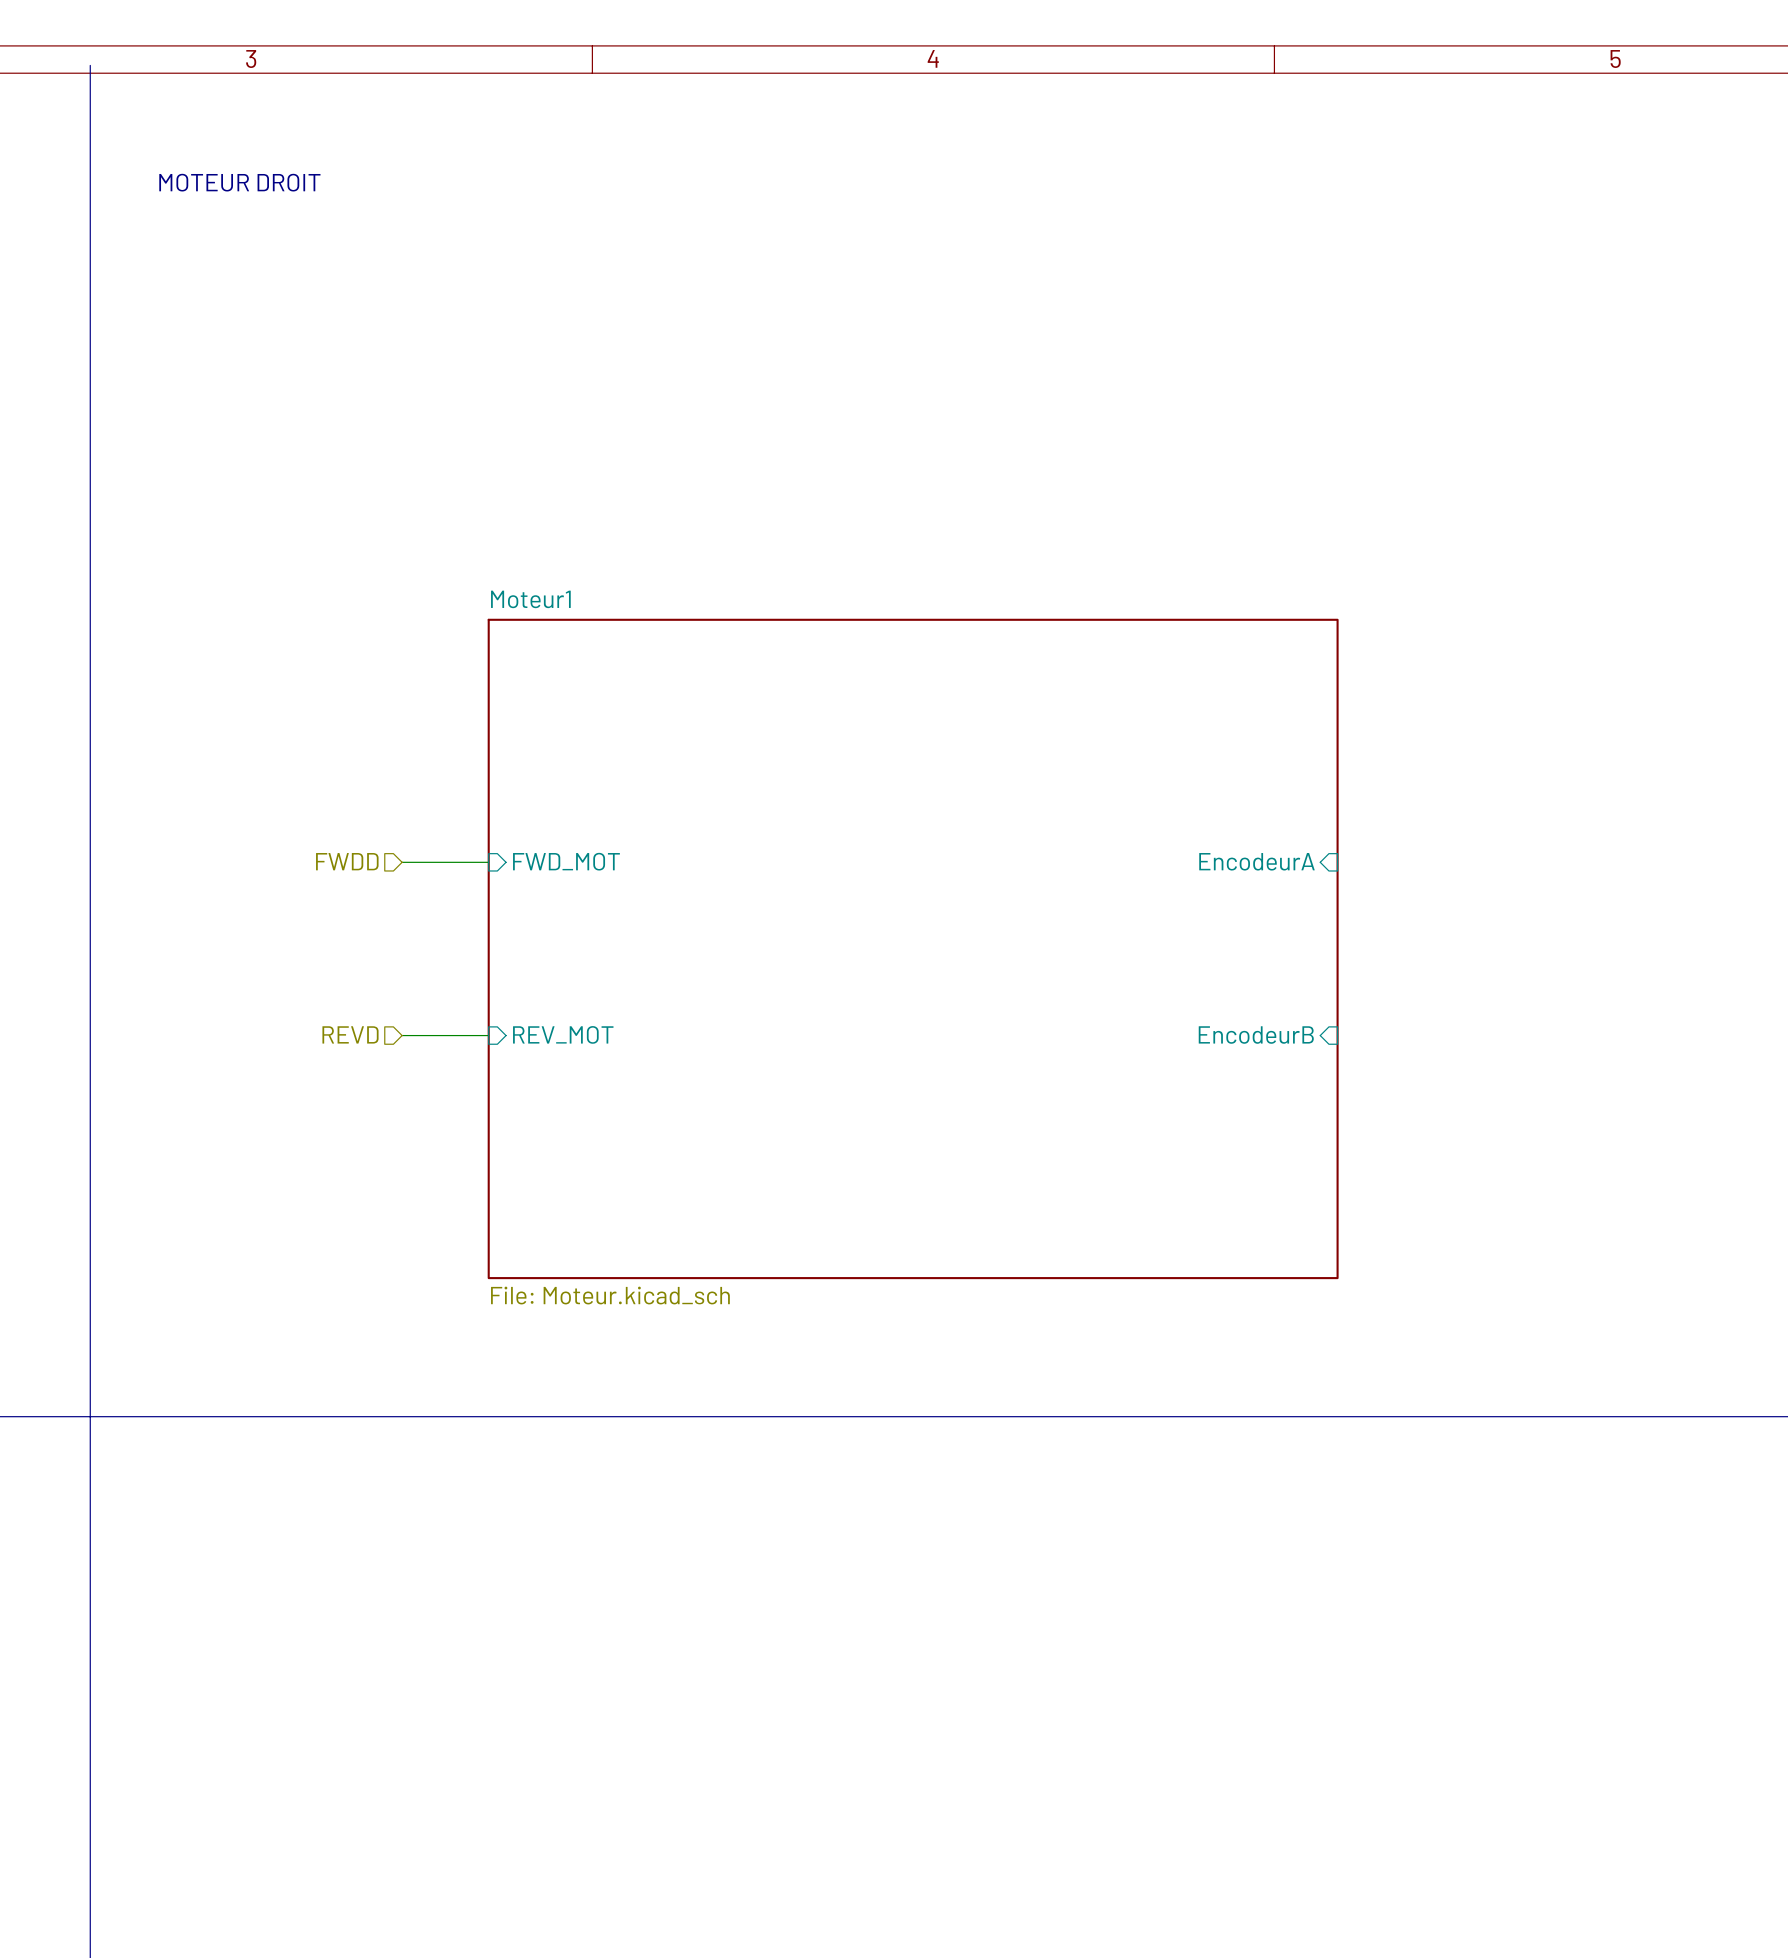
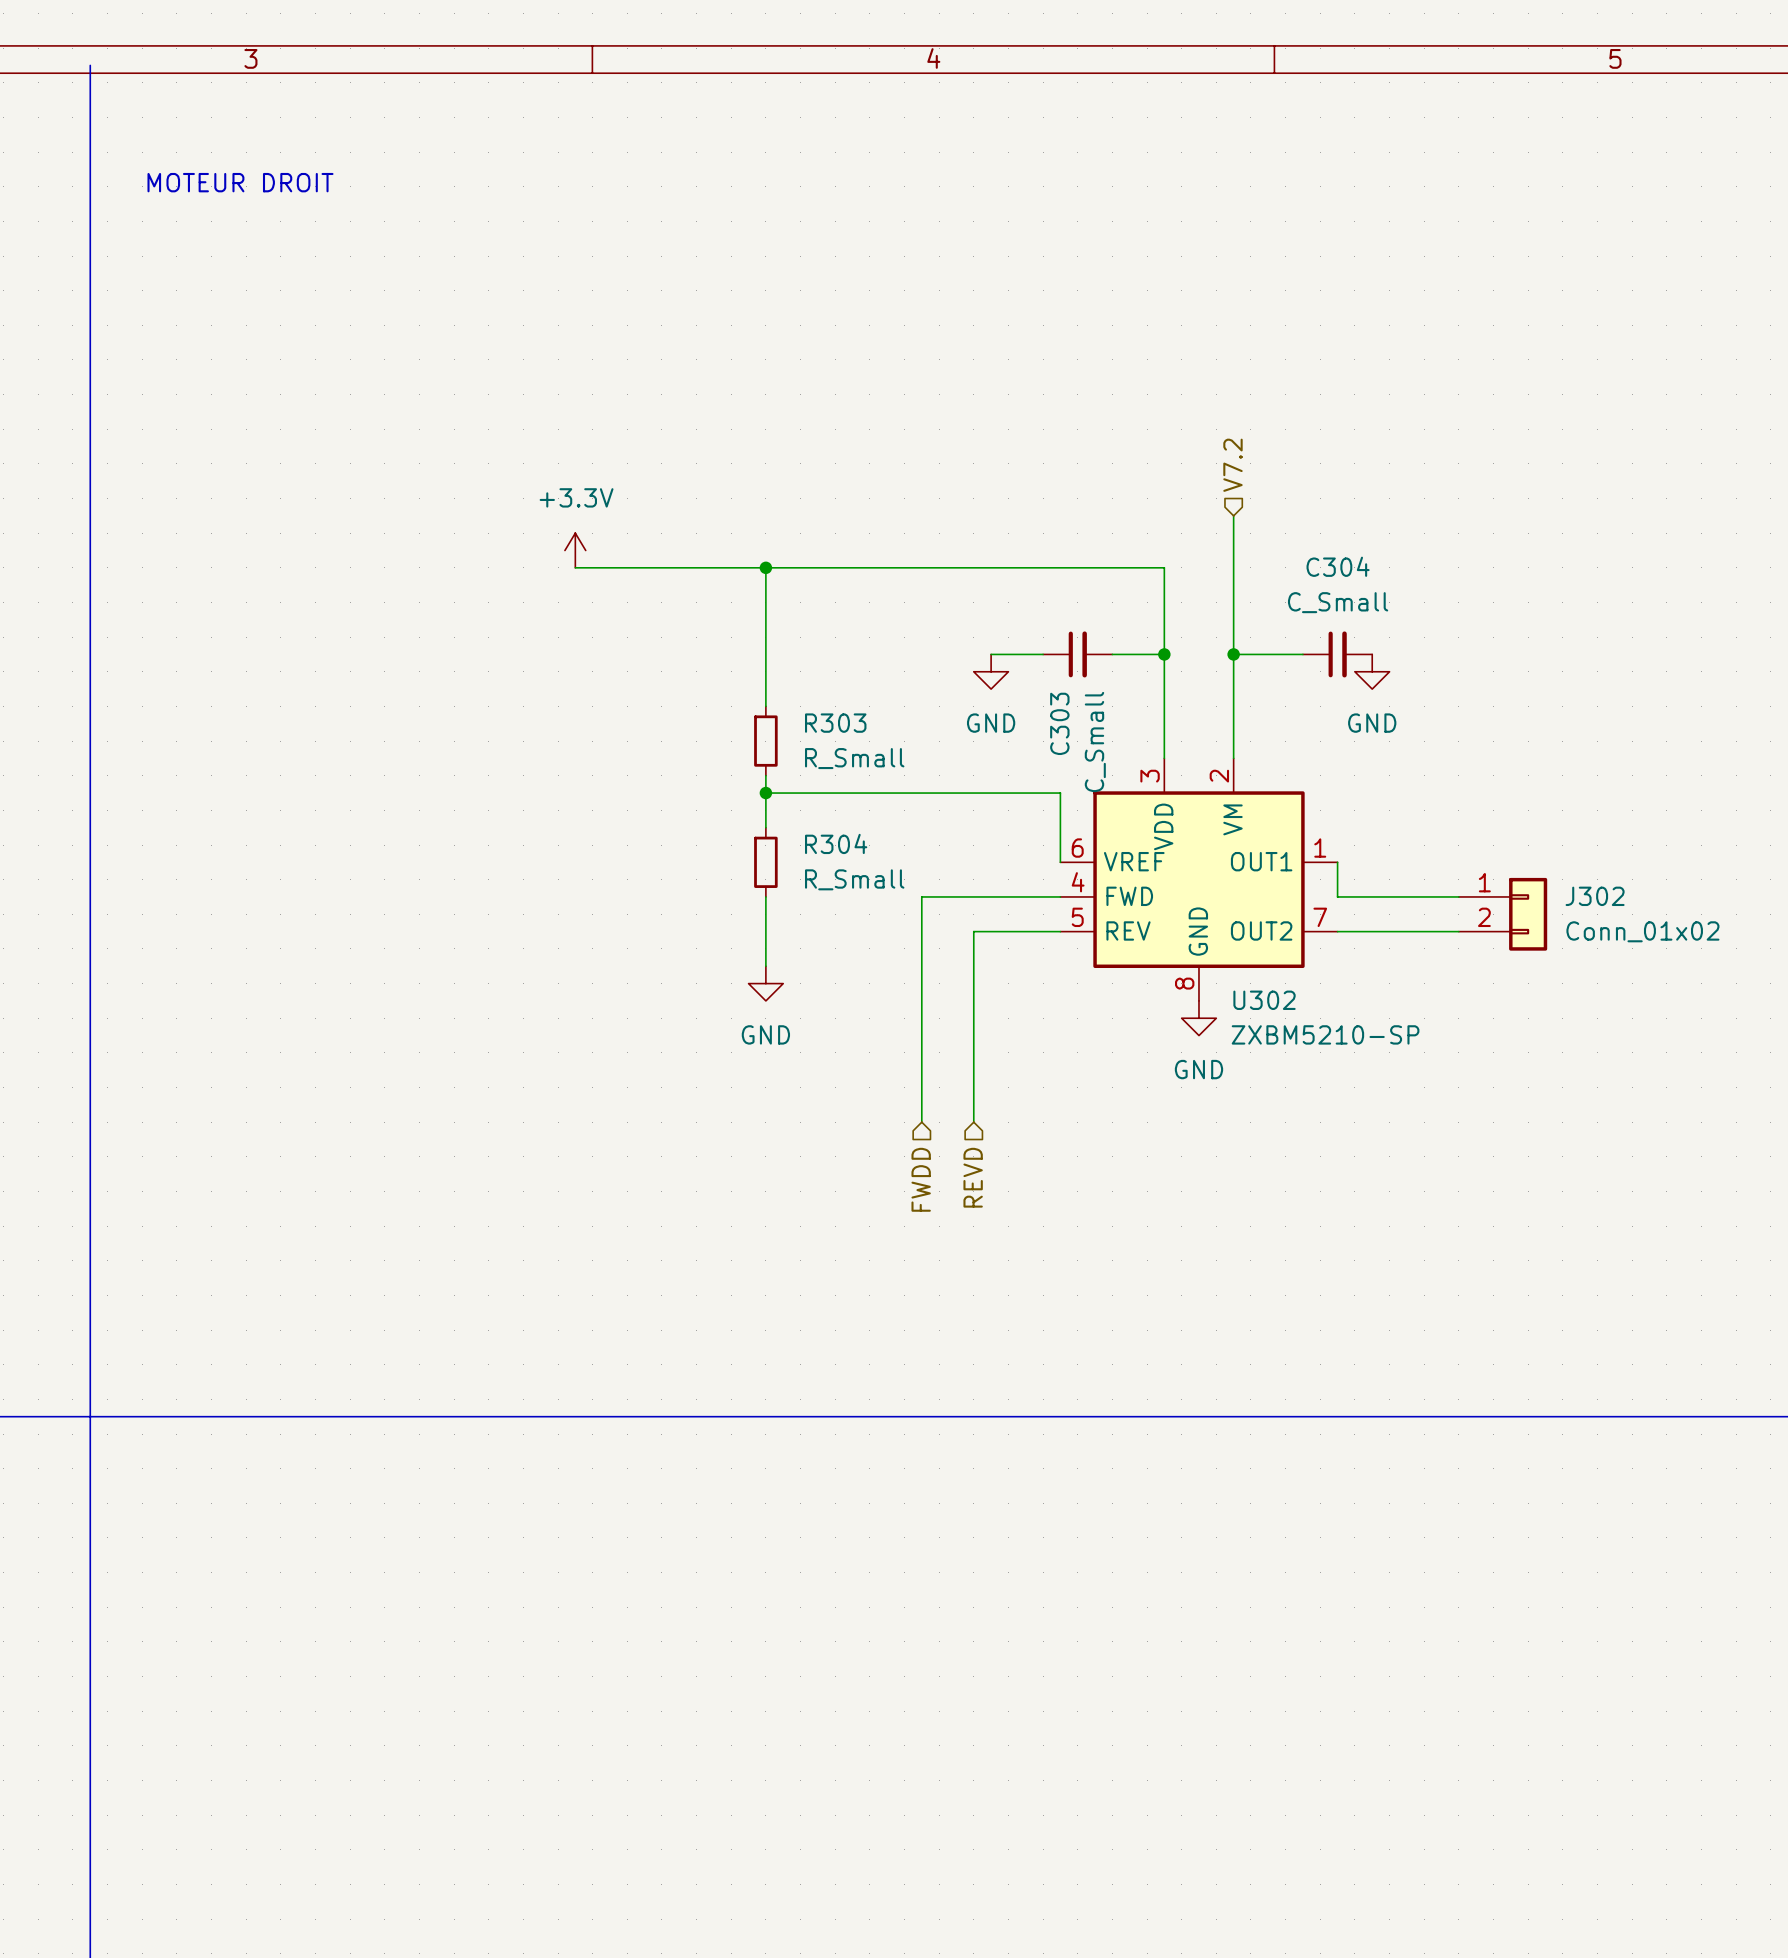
hierarchical label: none -> V7.2 (1232, 465)
wire: none -> (1233, 515) (1233, 758)
power symbol: none -> +3.3V (575, 550)
wire: none -> (575, 567) (1164, 567) (1164, 758)
wire: none -> (765, 567) (765, 706)
junction: none -> (765, 567)
wire: none -> (991, 654) (1043, 654)
C303: none -> C_Small (1077, 654)
wire: none -> (1112, 654) (1164, 654)
junction: none -> (1164, 654)
wire: none -> (1233, 654) (1302, 654)
junction: none -> (1233, 654)
C304: none -> C_Small (1337, 654)
power symbol: none -> GND (991, 671)
power symbol: none -> GND (1372, 671)
R303: none -> R_Small (765, 741)
wire: none -> (765, 775) (765, 827)
wire: none -> (765, 793) (1060, 793) (1060, 862)
junction: none -> (765, 793)
hierarchical label: FWDD (347, 861) -> none
sheet pin: FWD_MOT (566, 861) -> none
sheet pin: EncodeurA (1256, 861) -> none
wire: (402, 862) (488, 862) -> none
R304: none -> R_Small (765, 862)
wire: none -> (1337, 862) (1337, 896) (1458, 896)
U302: none -> ZXBM5210-SP (1198, 879)
wire: none -> (765, 896) (765, 966)
wire: none -> (1060, 896) (921, 896) (921, 1122)
J302: none -> Conn_01x02 (1503, 914)
wire: none -> (1060, 931) (973, 931) (973, 1122)
wire: none -> (1337, 931) (1458, 931)
sheet Moteur1: File: Moteur.kicad_sch (913, 948) -> none
power symbol: none -> GND (765, 983)
power symbol: none -> GND (1198, 1018)
hierarchical label: REVD (350, 1034) -> none
sheet pin: REV_MOT (563, 1034) -> none
wire: (402, 1035) (488, 1035) -> none
sheet pin: EncodeurB (1256, 1035) -> none
hierarchical label: none -> REVD (973, 1177)
hierarchical label: none -> FWDD (921, 1179)

